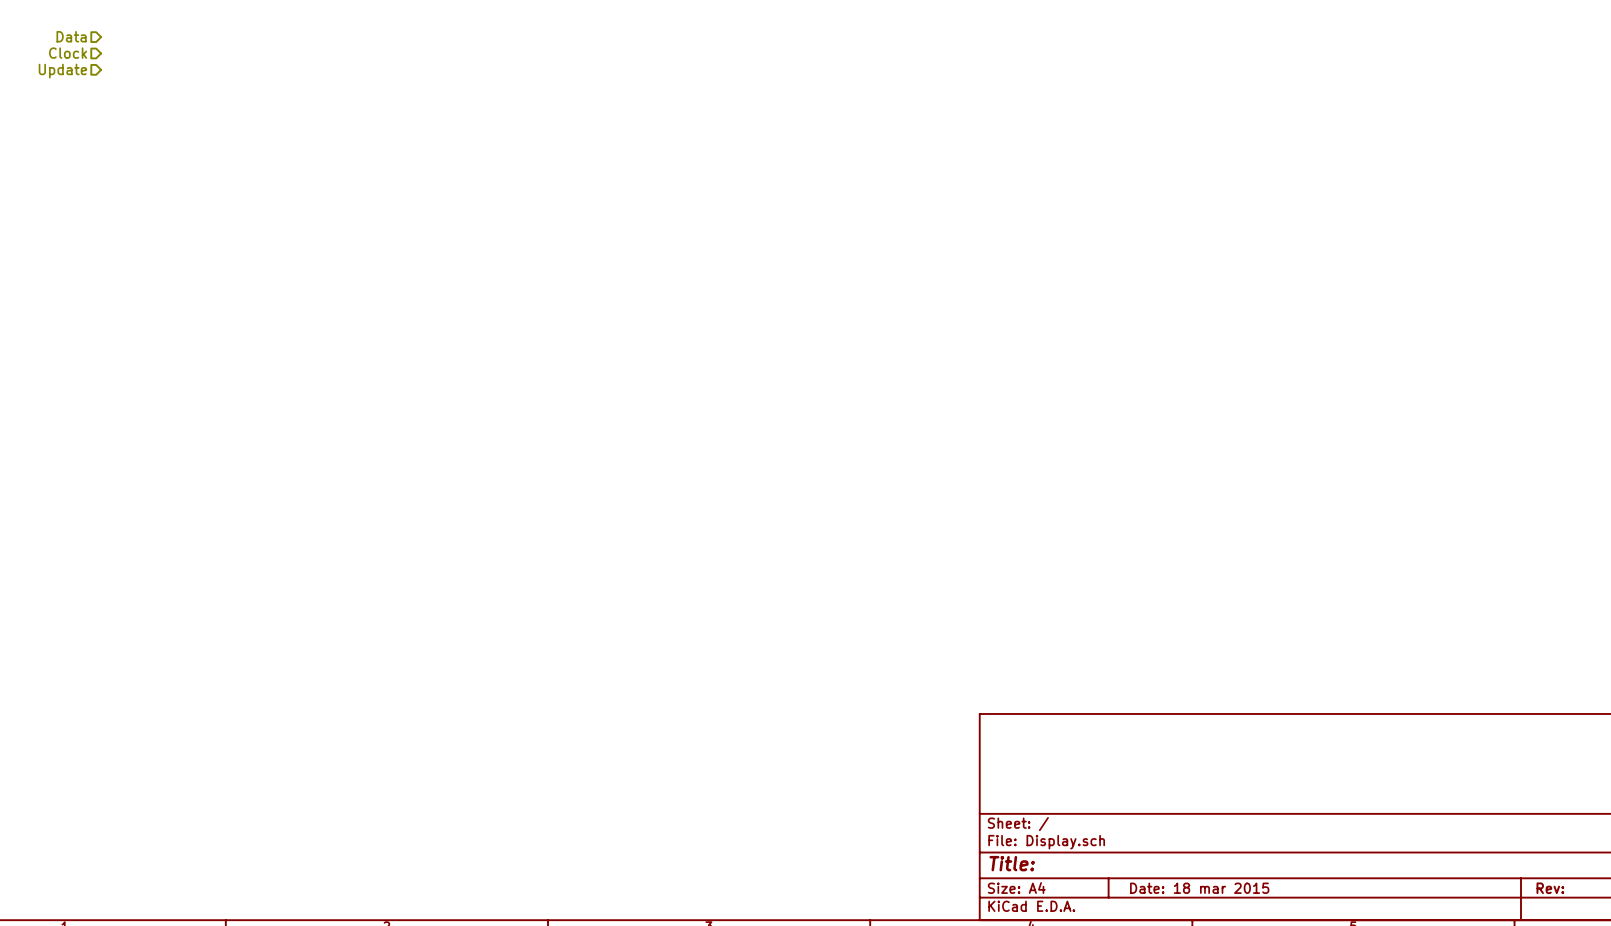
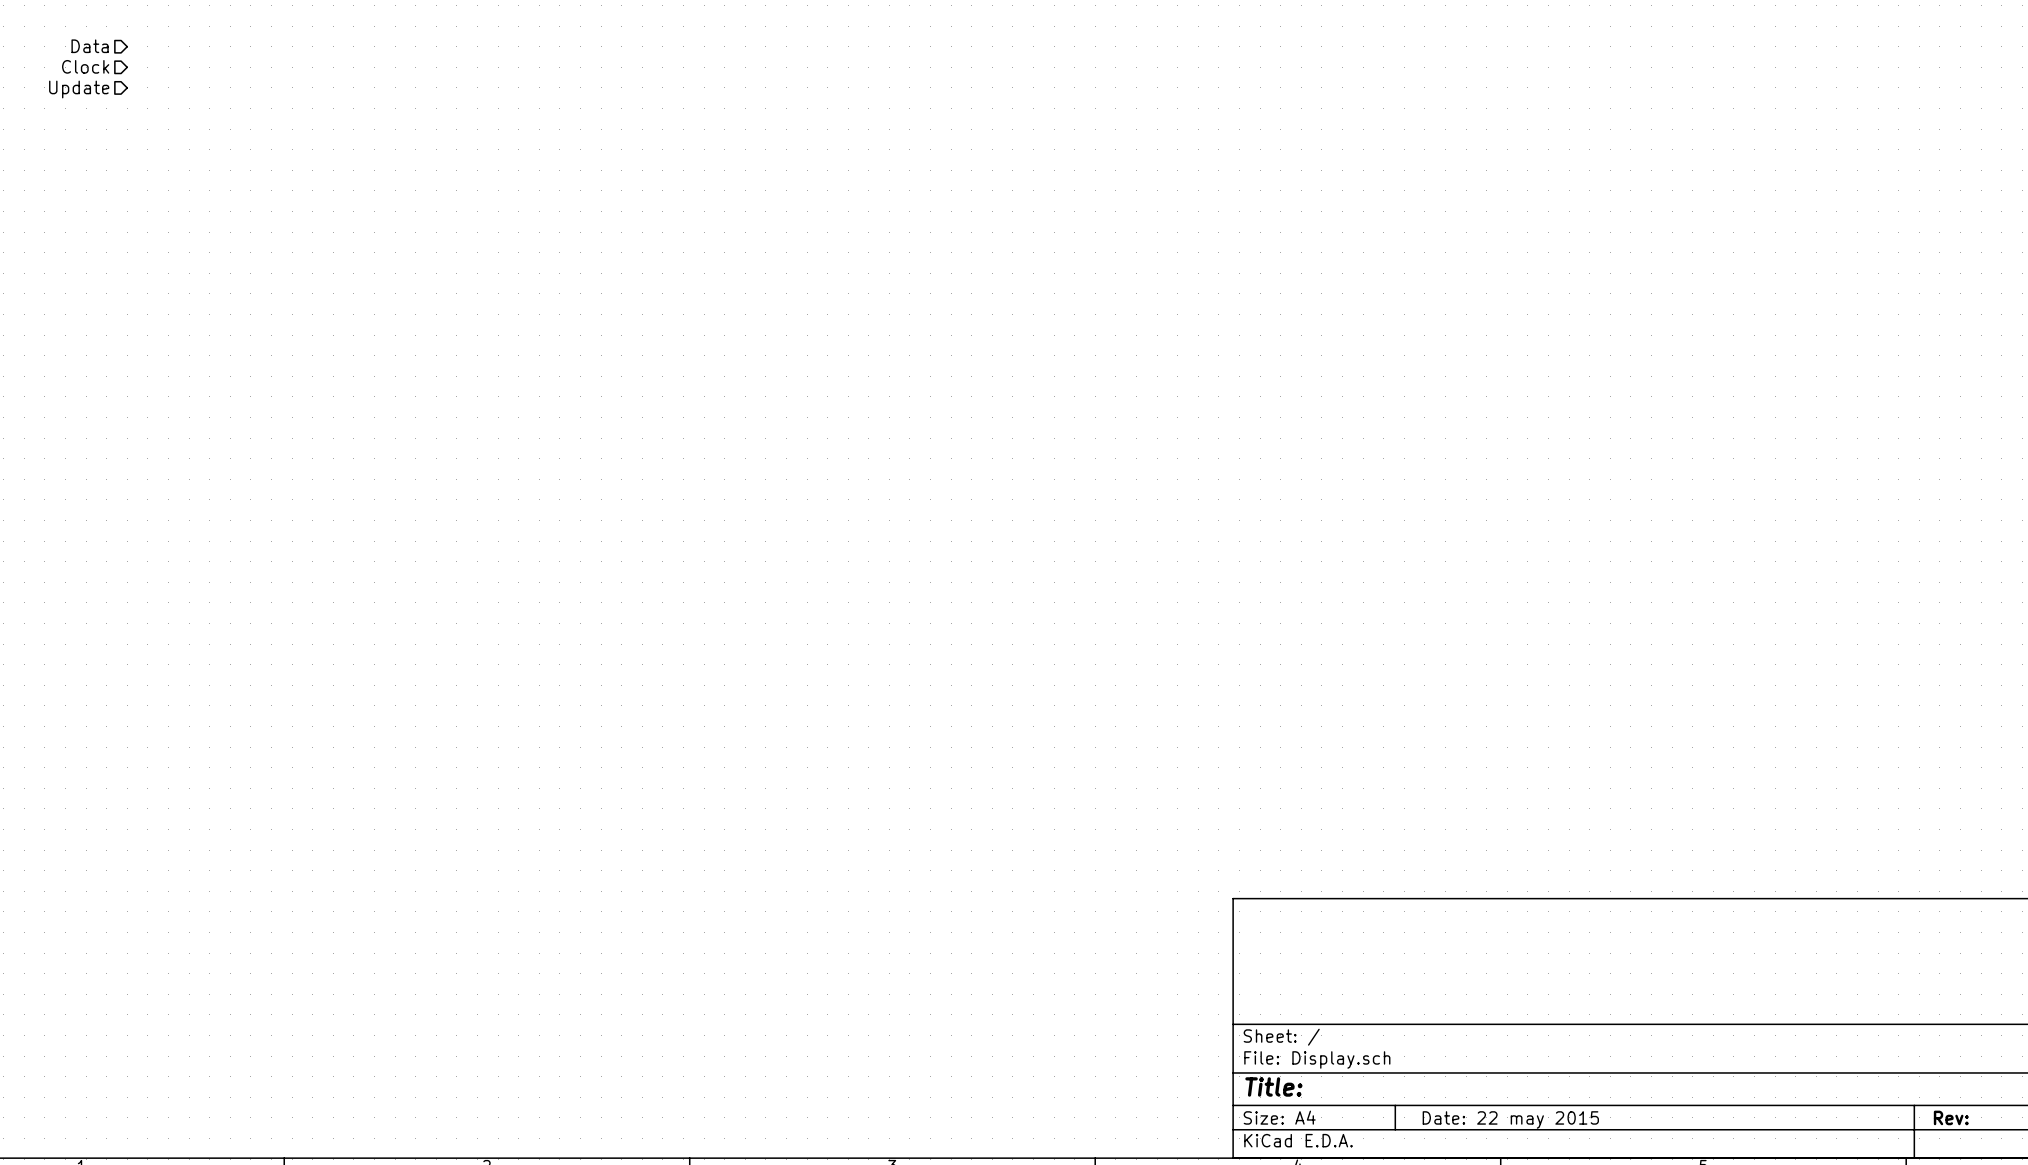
title block: Date: 18 mar 2015 (1199, 888) -> Date: 22 may 2015 (1510, 1119)

